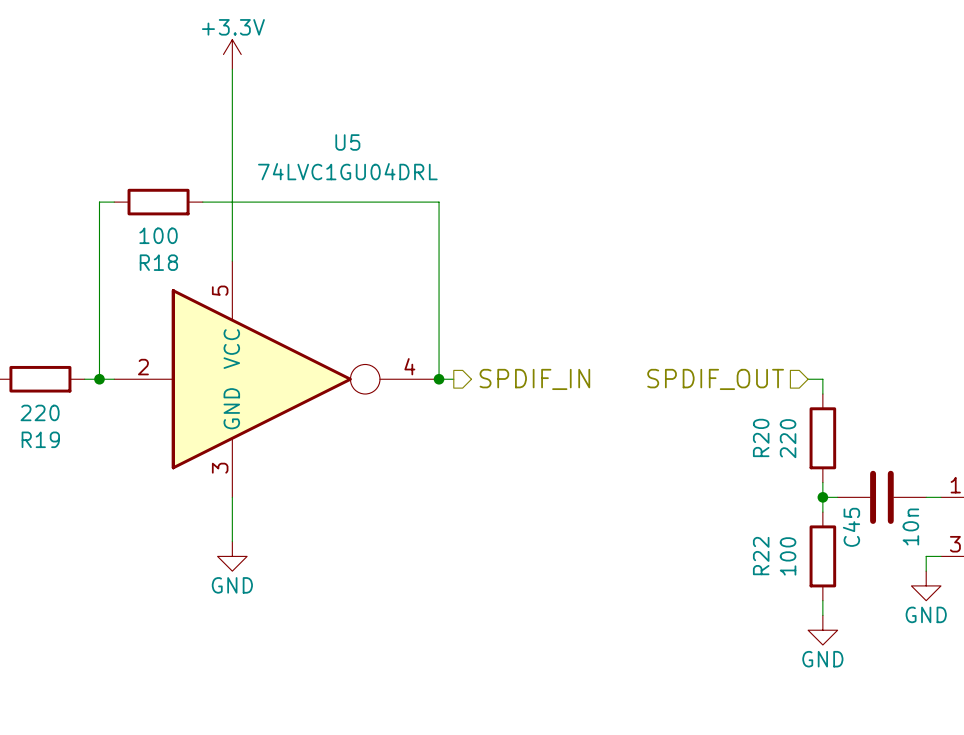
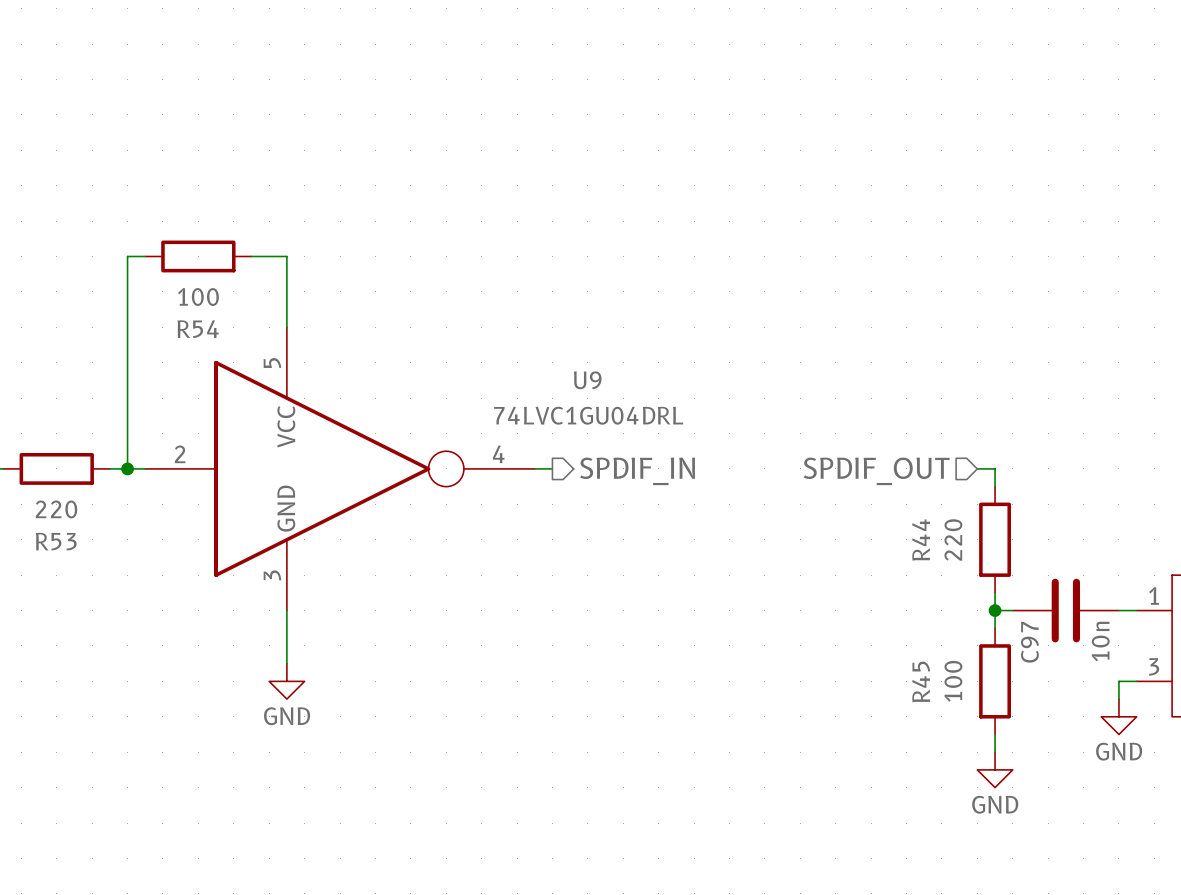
power symbol: +3.3V (232, 54) -> none
wire: (232, 69) (232, 202) (439, 202) (439, 379) -> none
U5 name: U5 (347, 142) -> U9 (587, 380)
U5 value position: 74LVC1GU04DRL (347, 171) -> 74LVC1GU04DRL (588, 415)
R18 name: R18 (158, 262) -> R54 (198, 329)
junction: (439, 379) -> none
R20 name: R20 (761, 437) -> R44 (921, 540)
R19 name: R19 (40, 439) -> R53 (56, 541)
C45 name: C45 (851, 527) -> C97 (1029, 642)
R22 name: R22 (761, 556) -> R45 (921, 681)

